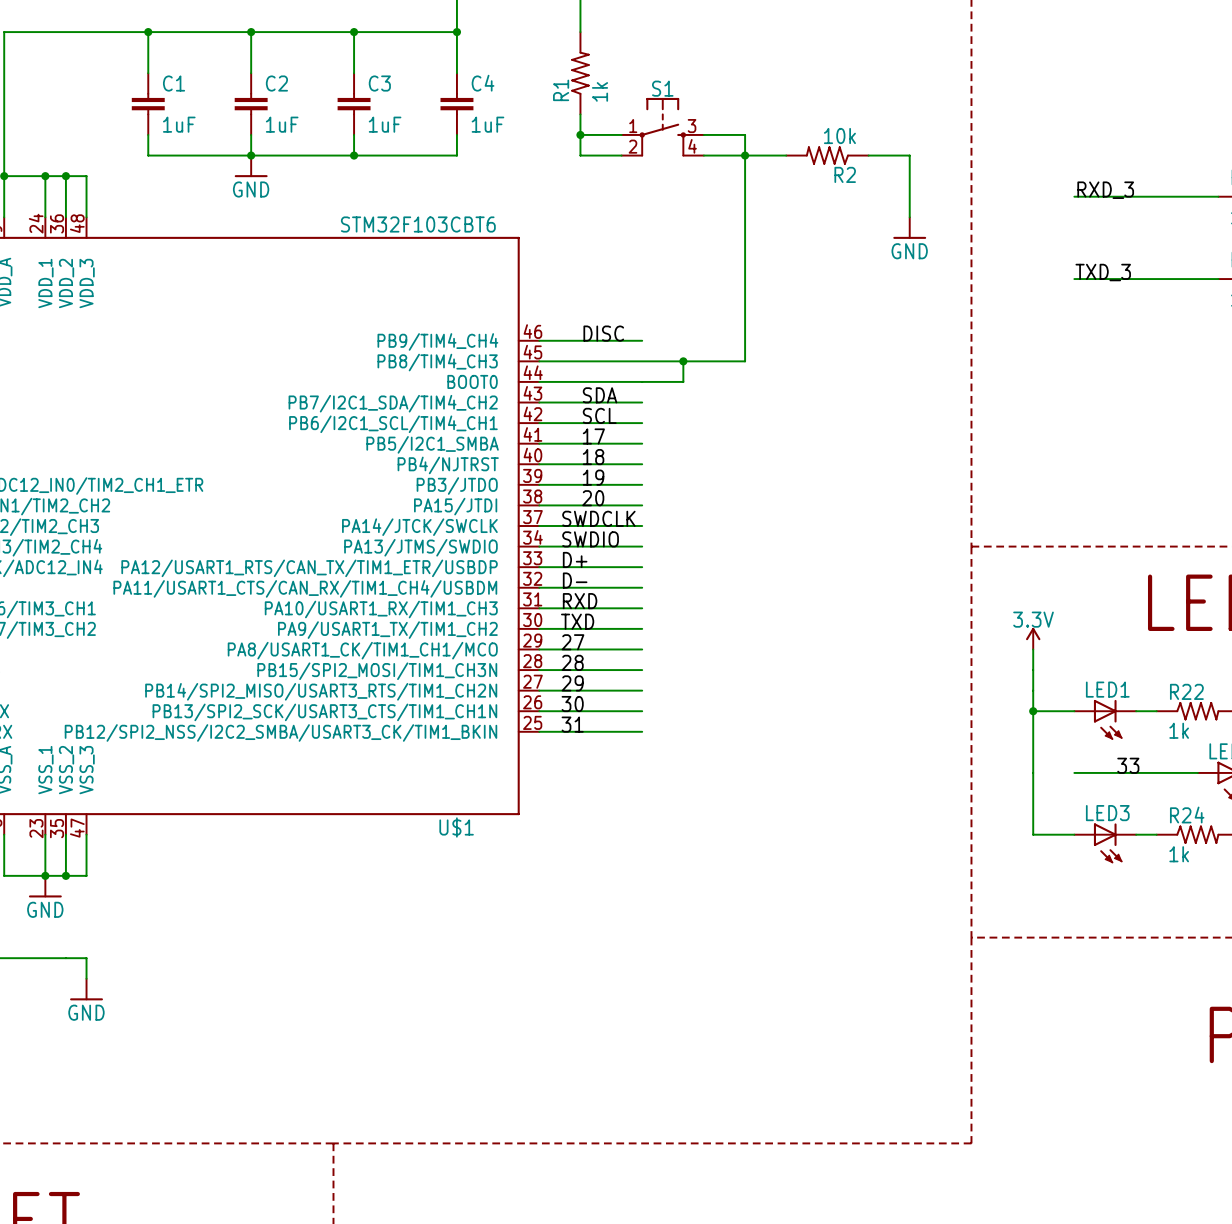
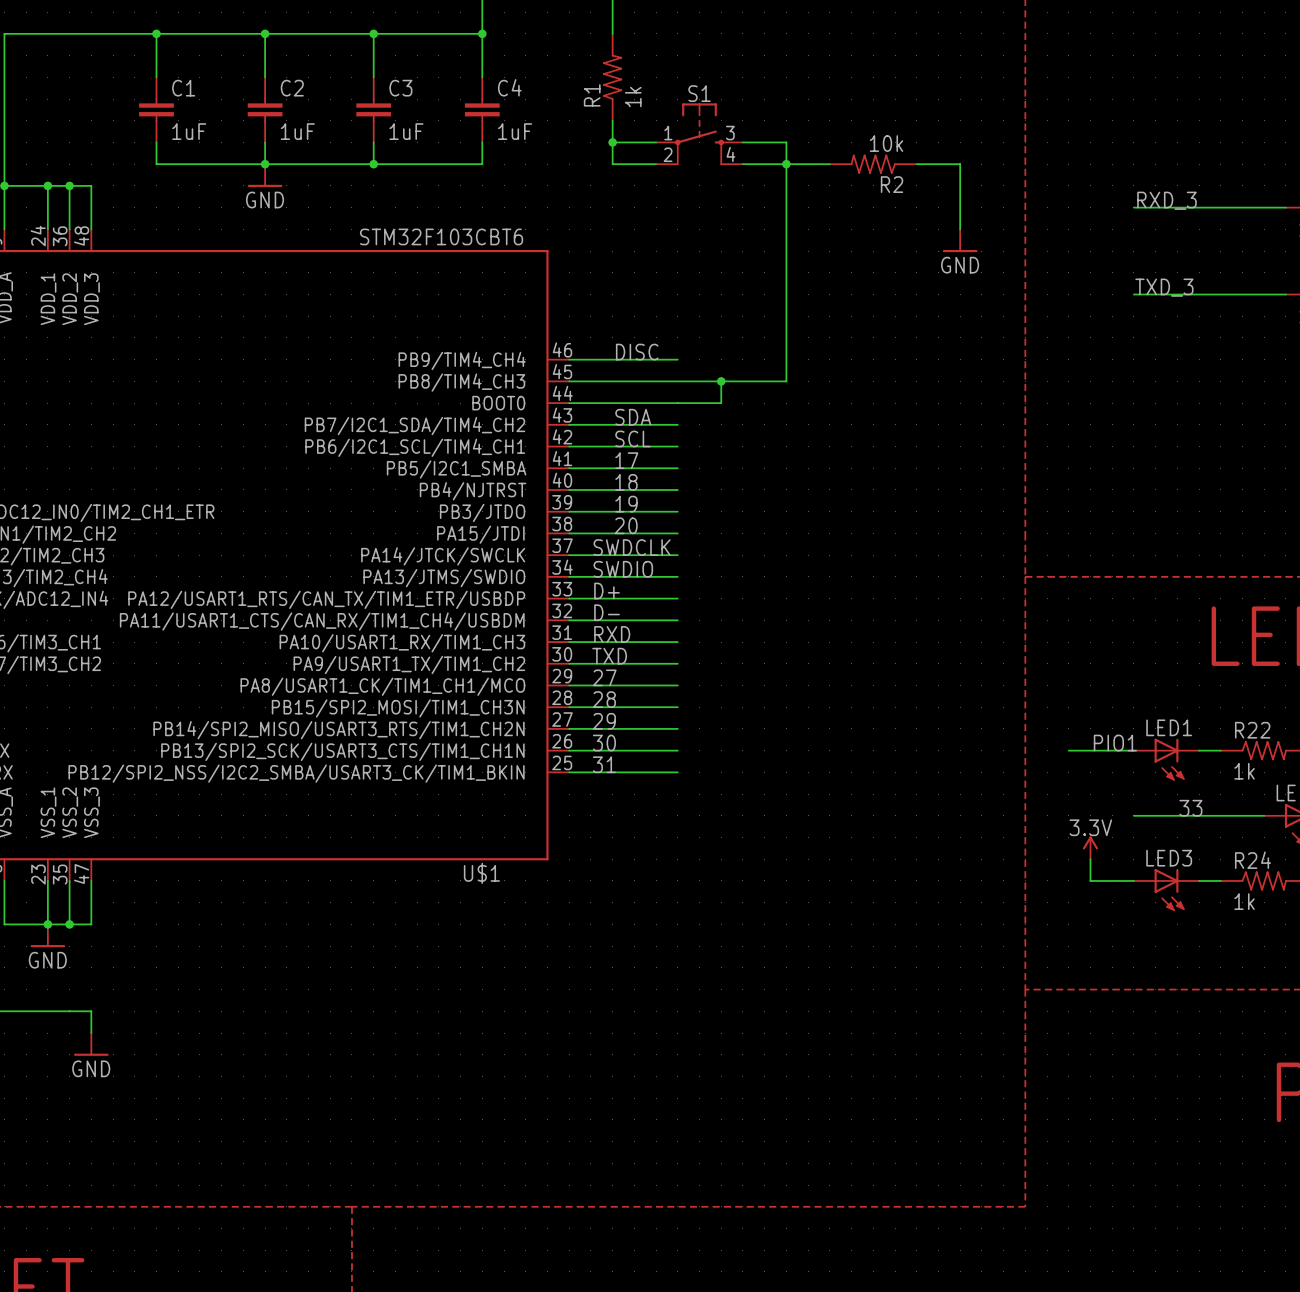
power symbol position: 3.3V (1033, 638) -> 3.3V (1090, 847)
wire: (1033, 649) (1033, 814) -> none
label: none -> PIO1 (1115, 743)
wire: none -> (1068, 750) (1090, 750)
junction: (1033, 711) -> none

